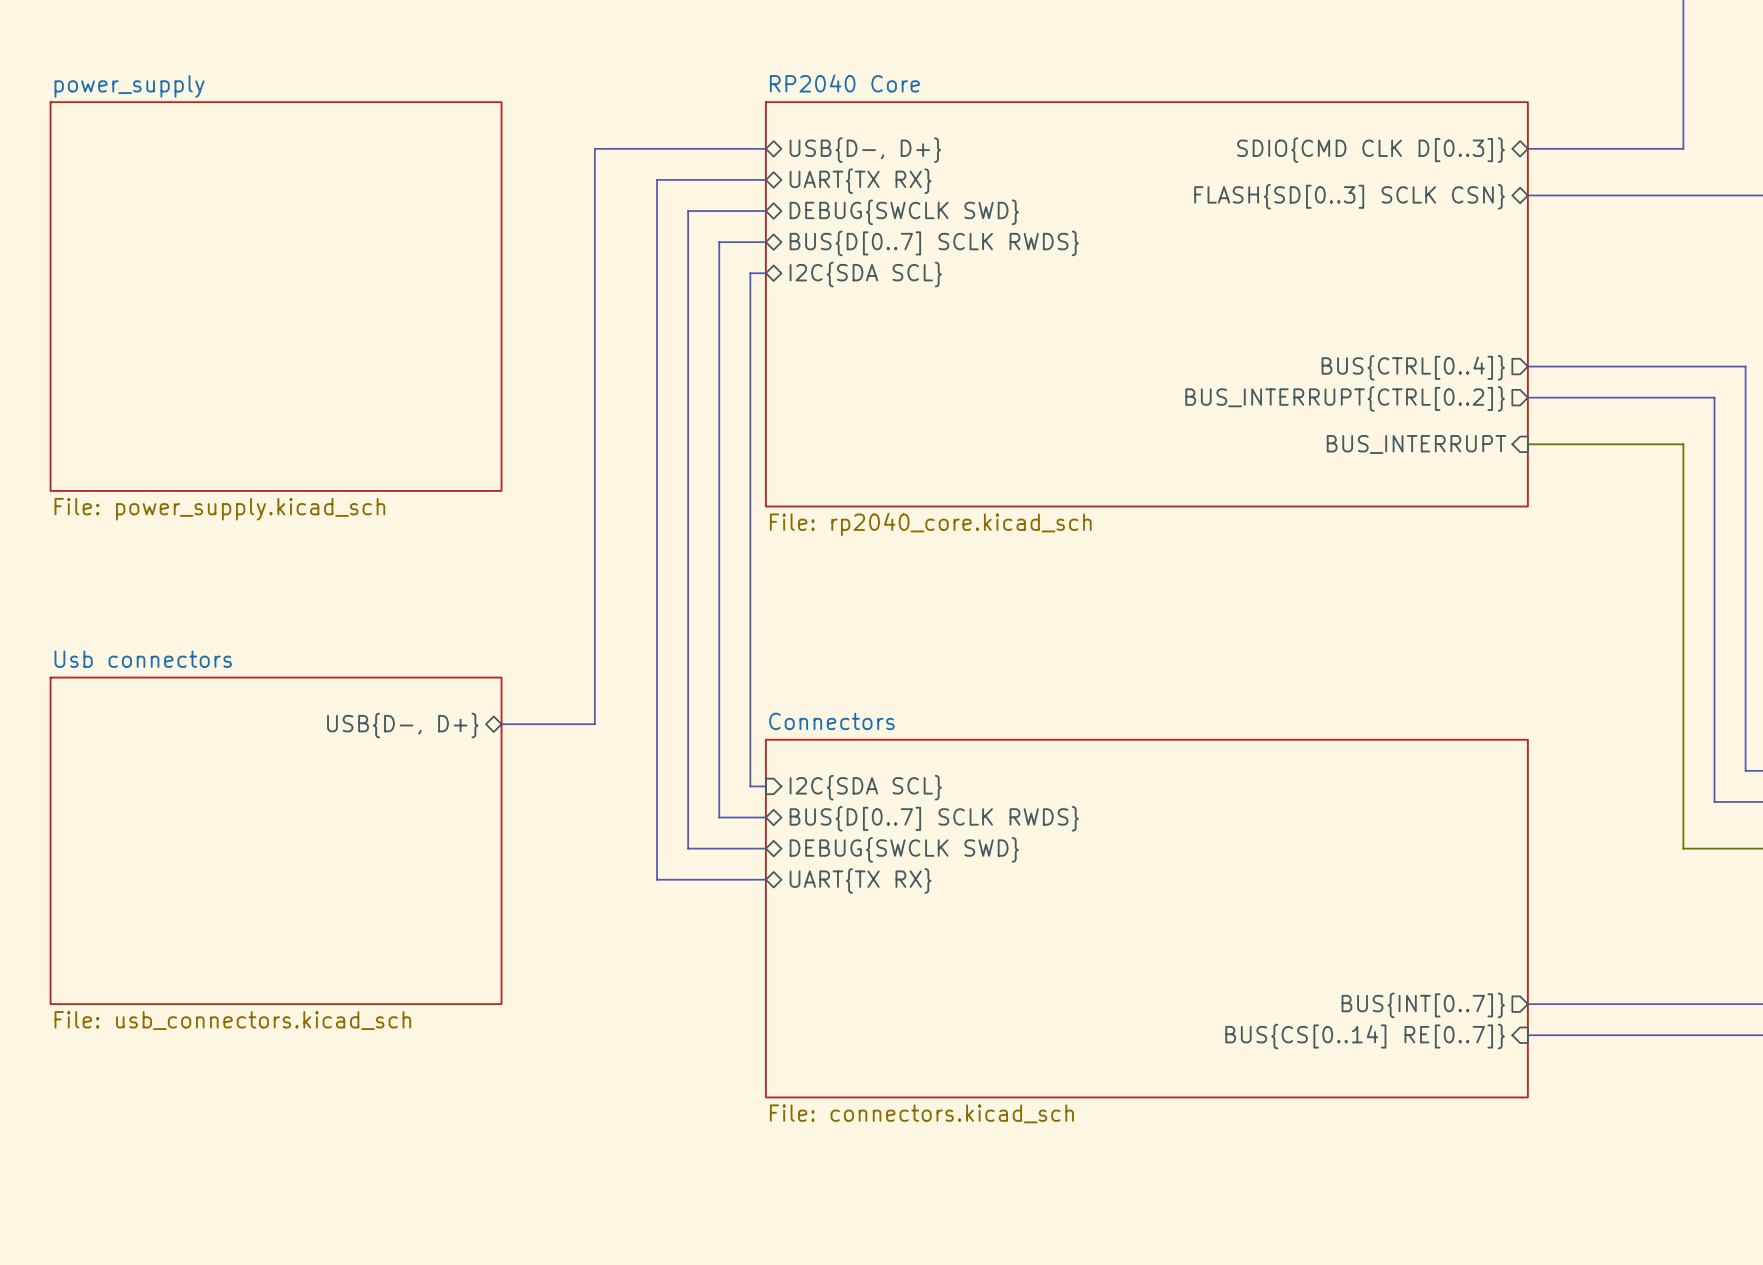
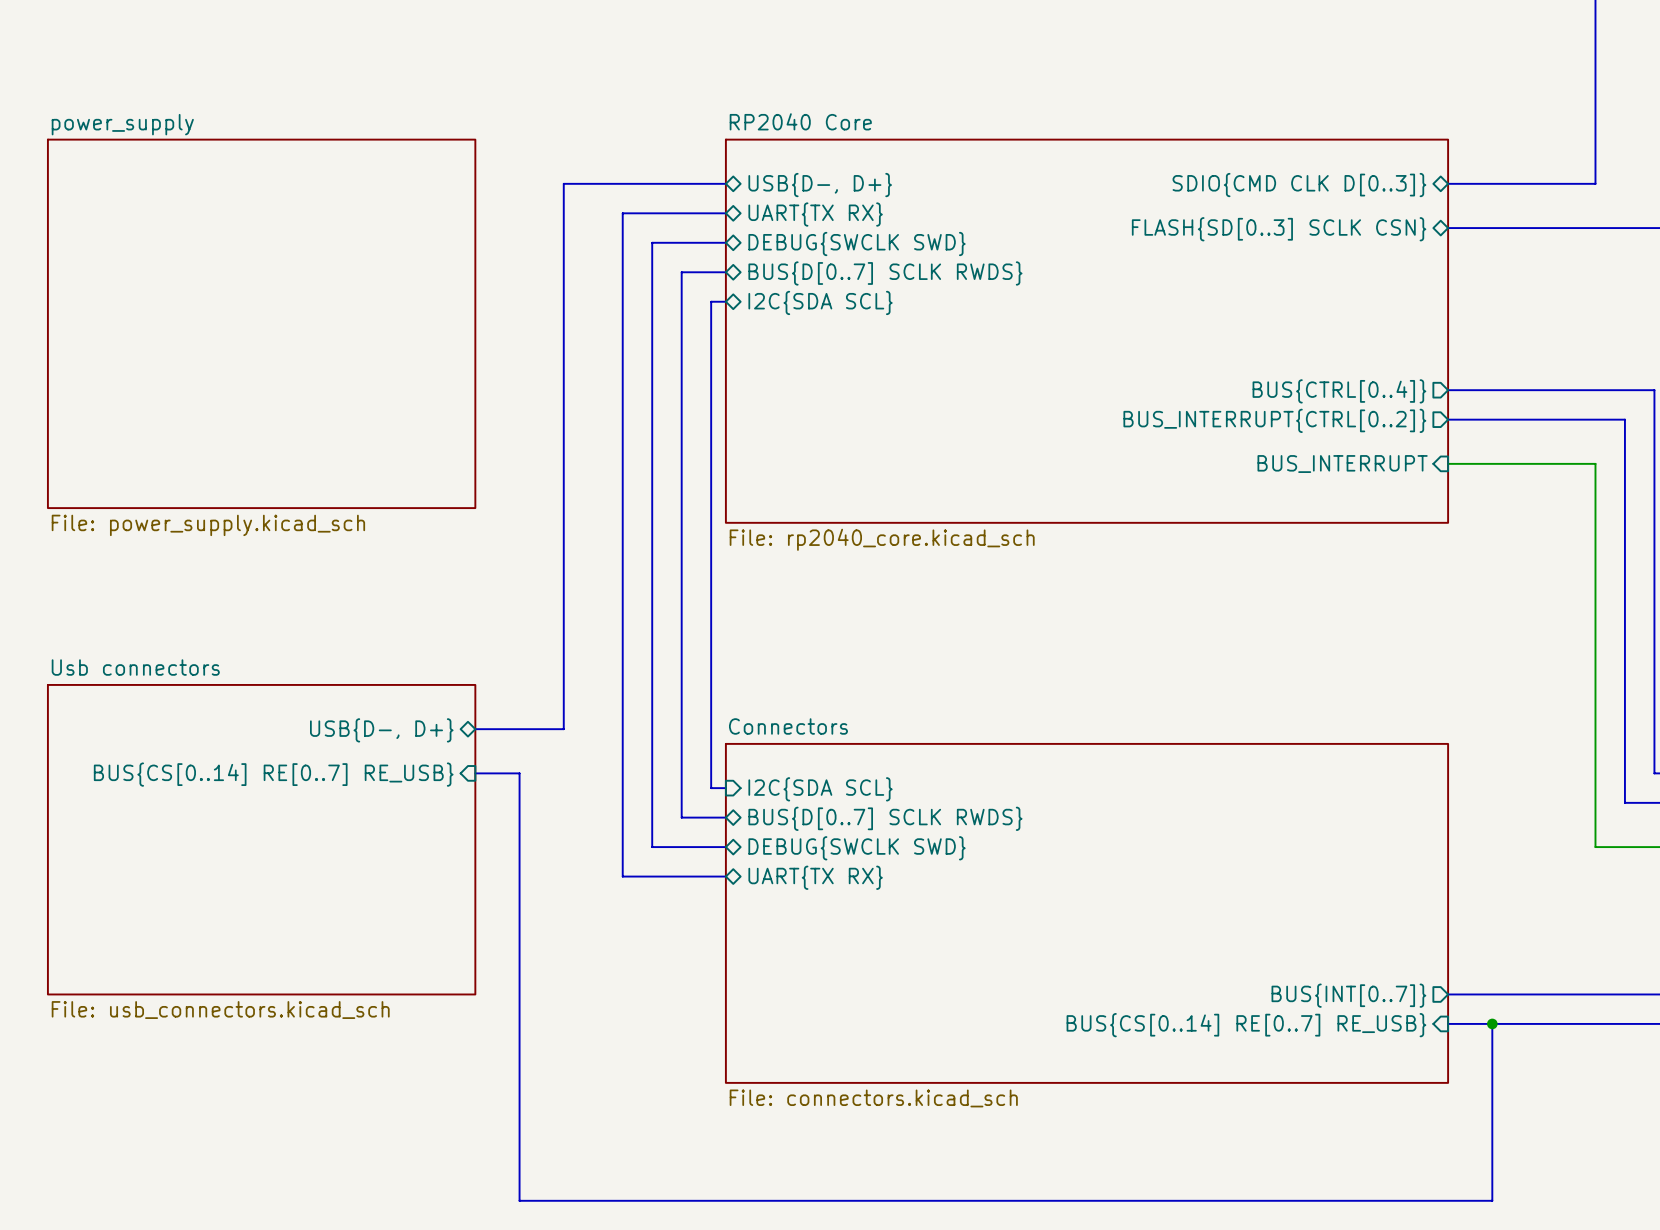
bus: none -> (475, 773) (519, 773) (519, 1200) (1492, 1200) (1492, 1023)
sheet pin: none -> BUS{CS[0..14] RE[0..7] RE_USB} (273, 774)
junction: none -> (1492, 1023)
sheet pin: BUS{CS[0..14] RE[0..7]} (1365, 1036) -> BUS{CS[0..14] RE[0..7] RE_USB} (1246, 1025)

